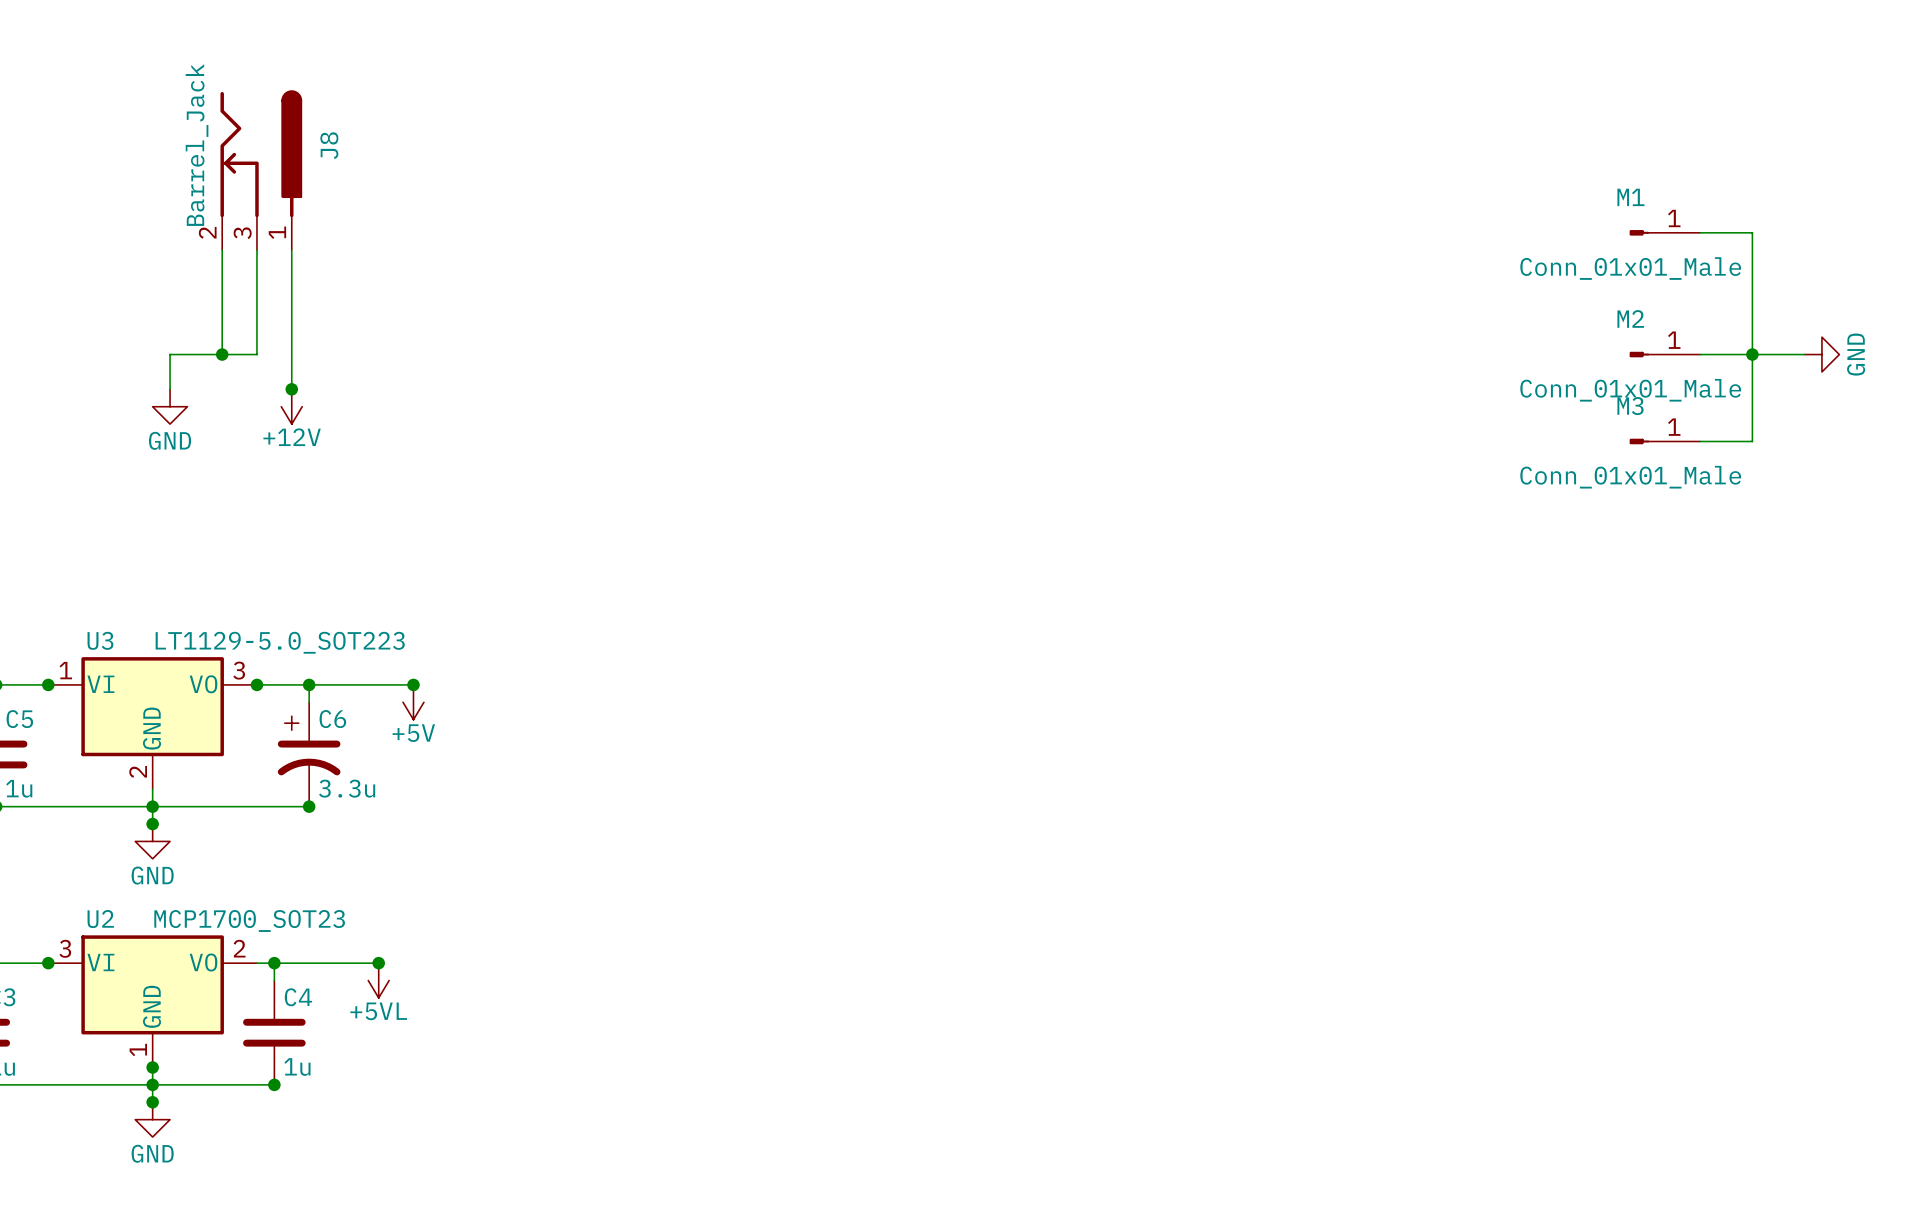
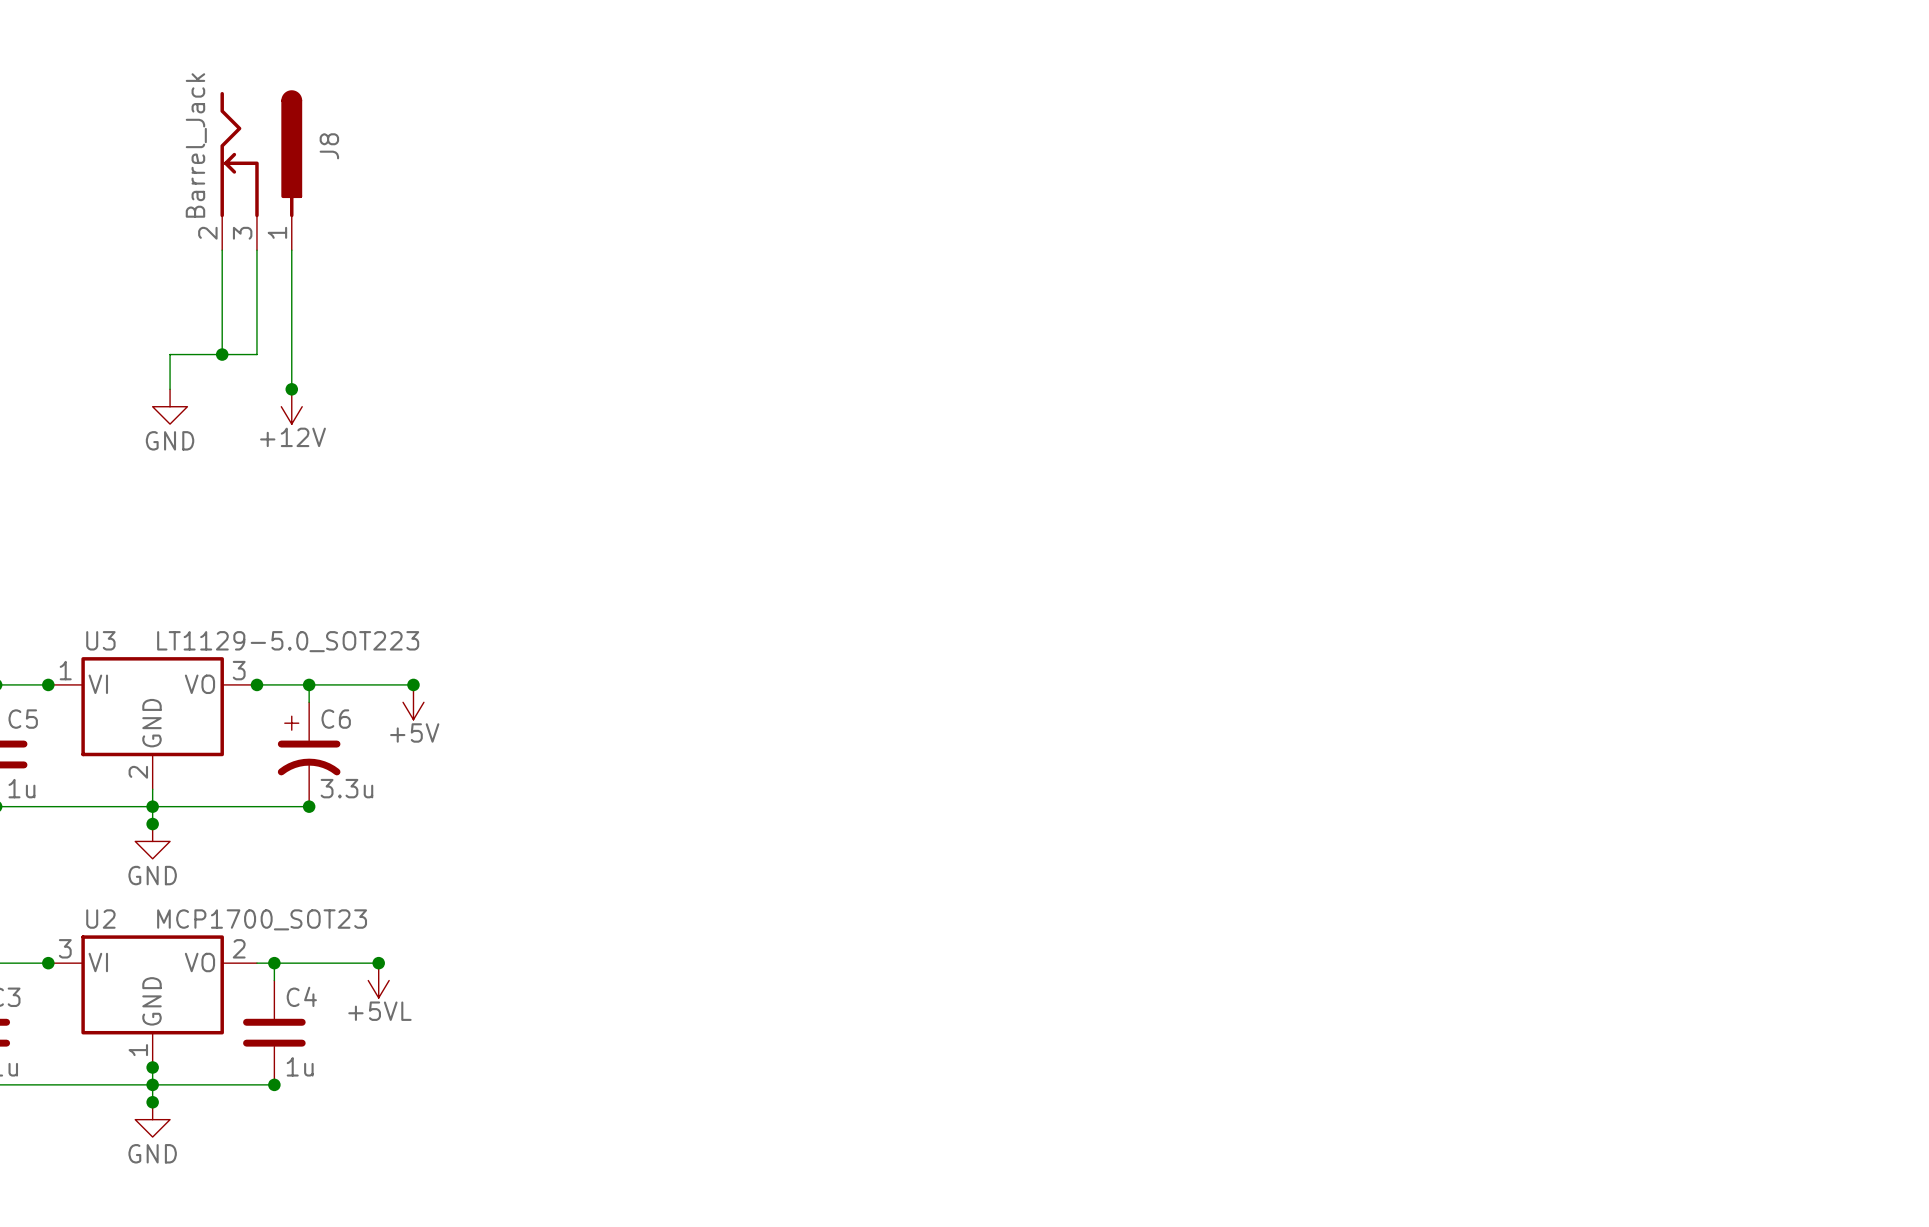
M1: Conn_01x01_Male (1664, 232) -> none
wire: (1700, 232) (1752, 232) (1752, 441) (1700, 441) -> none
M2: Conn_01x01_Male (1664, 354) -> none
wire: (1700, 354) (1804, 354) -> none
junction: (1752, 354) -> none
power symbol: GND (1821, 354) -> none
M3: Conn_01x01_Male (1664, 441) -> none

